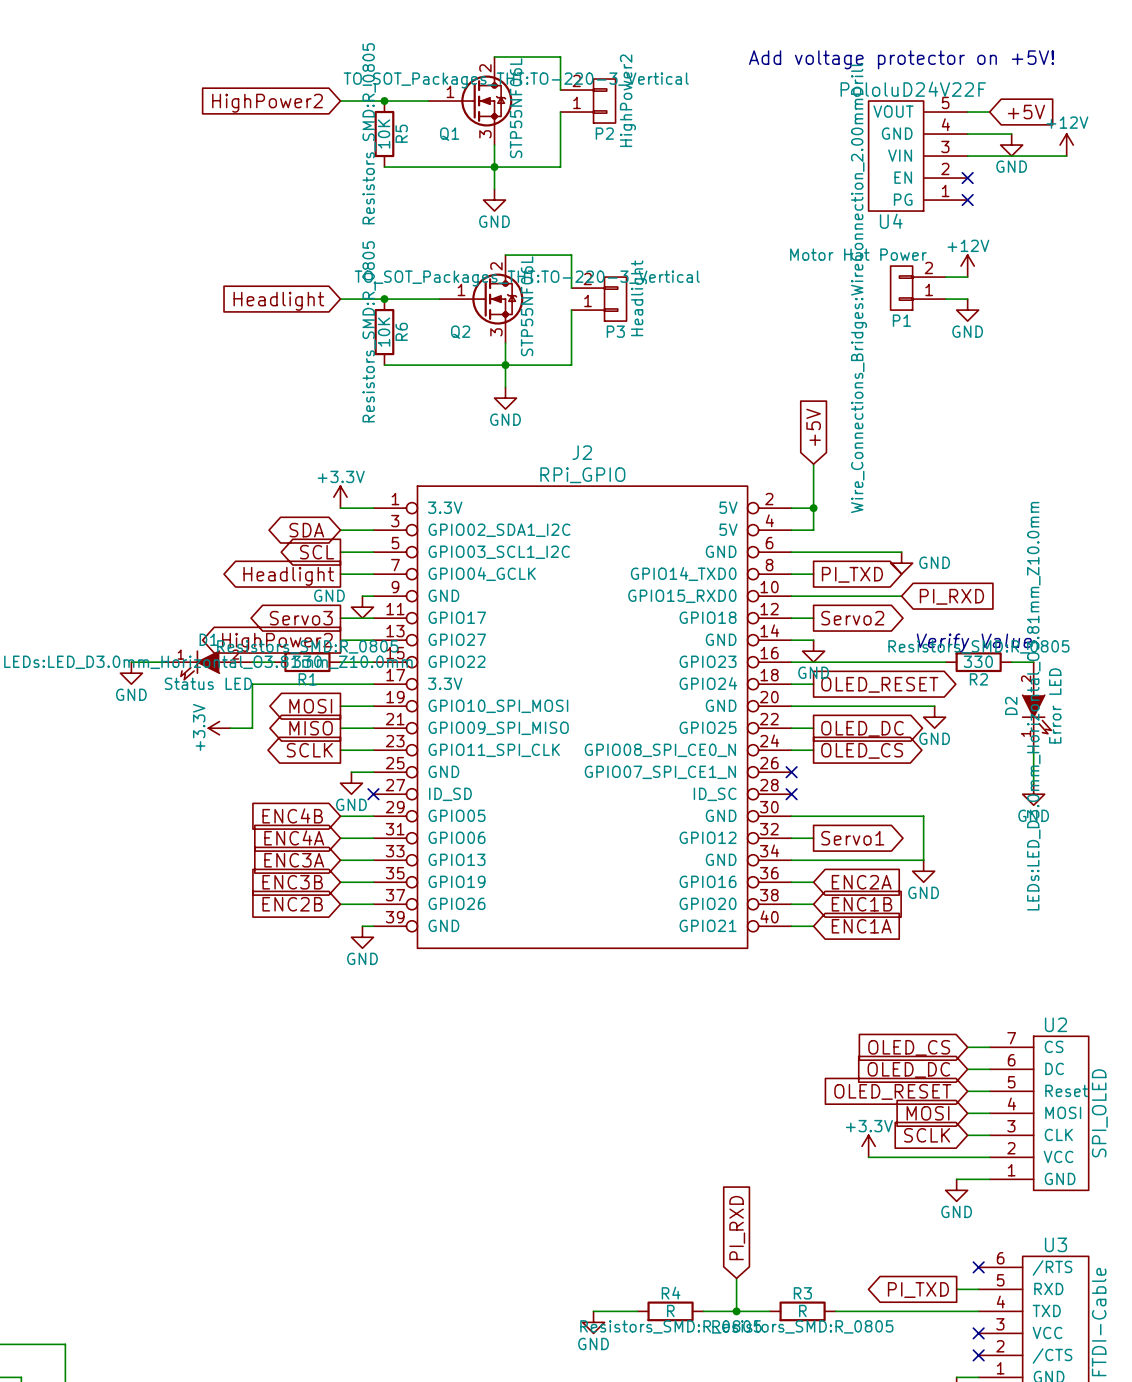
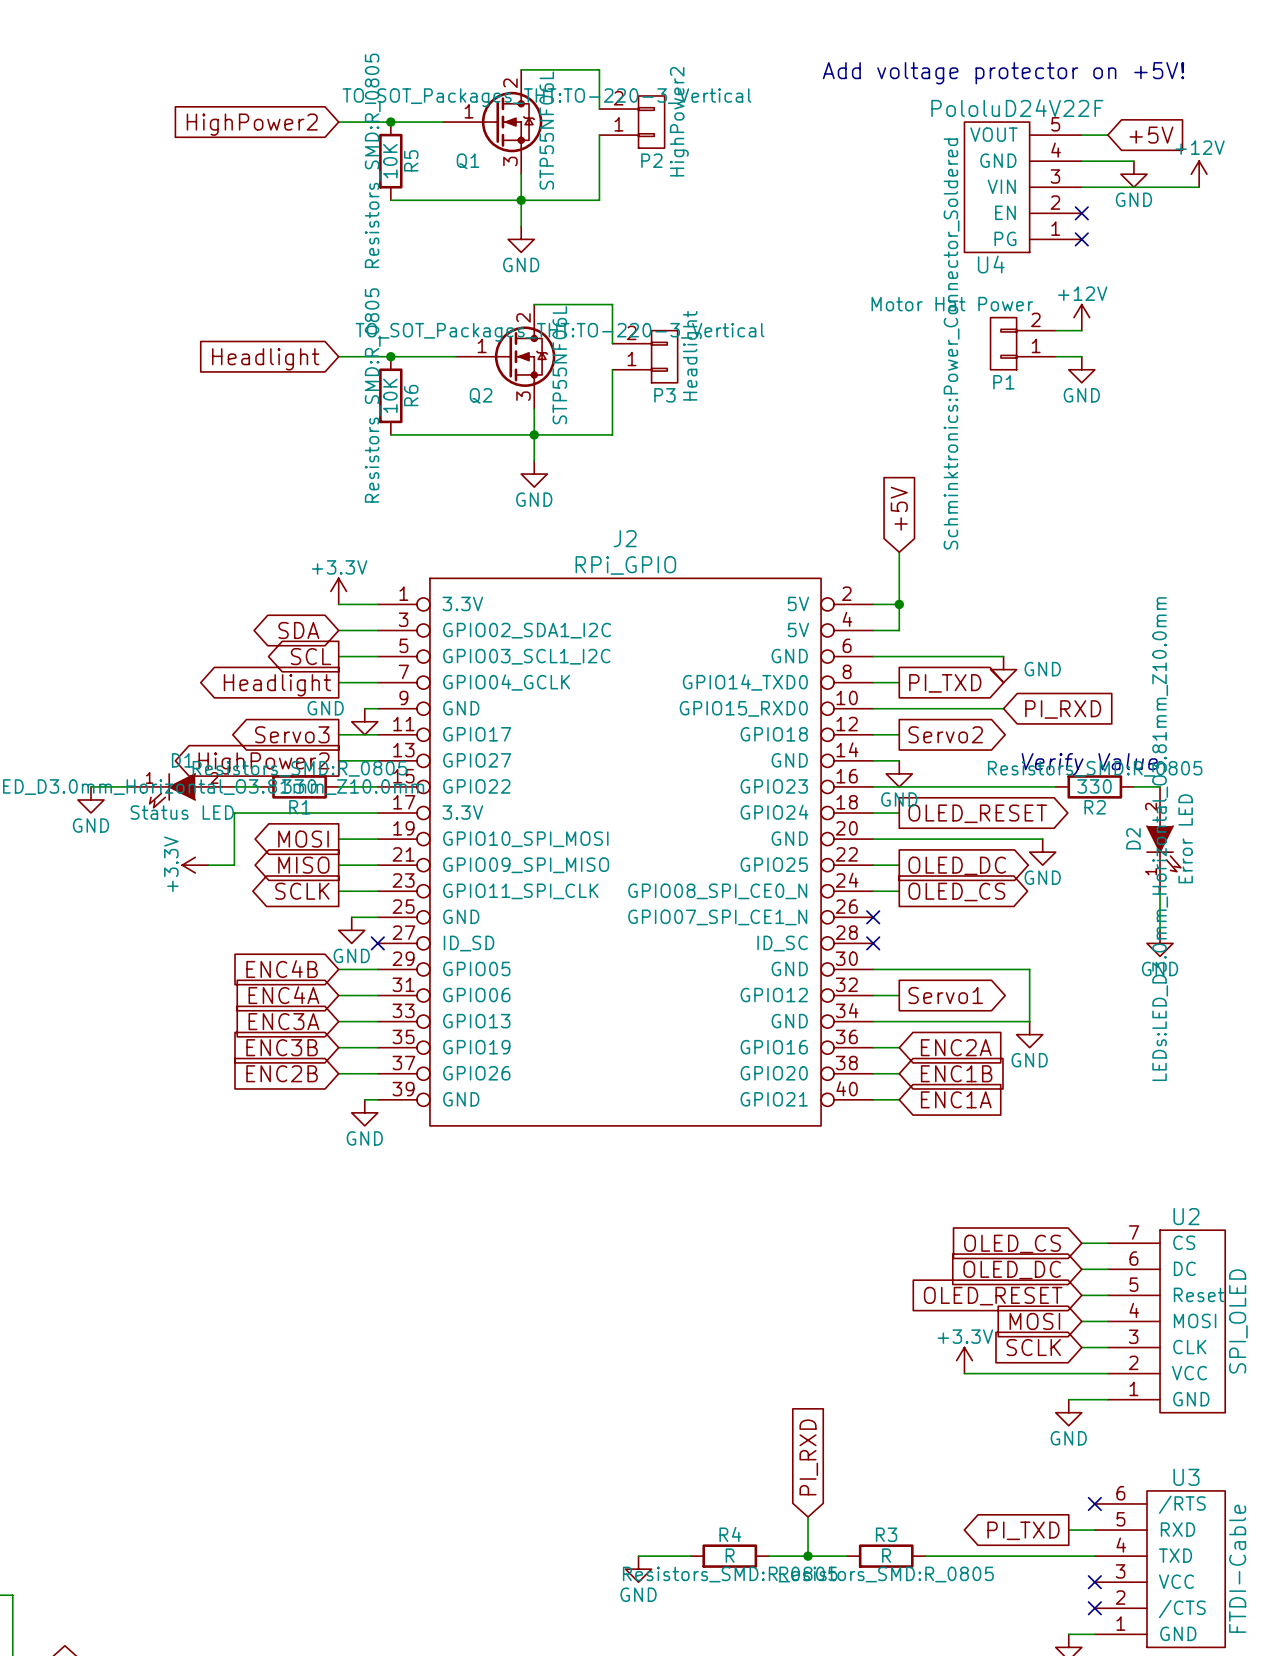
P1 text: Wire_Connections_Bridges:WireConnection_2.00mmDrill (859, 288) -> Schminktronics:Power_Connector_Soldered (951, 343)

